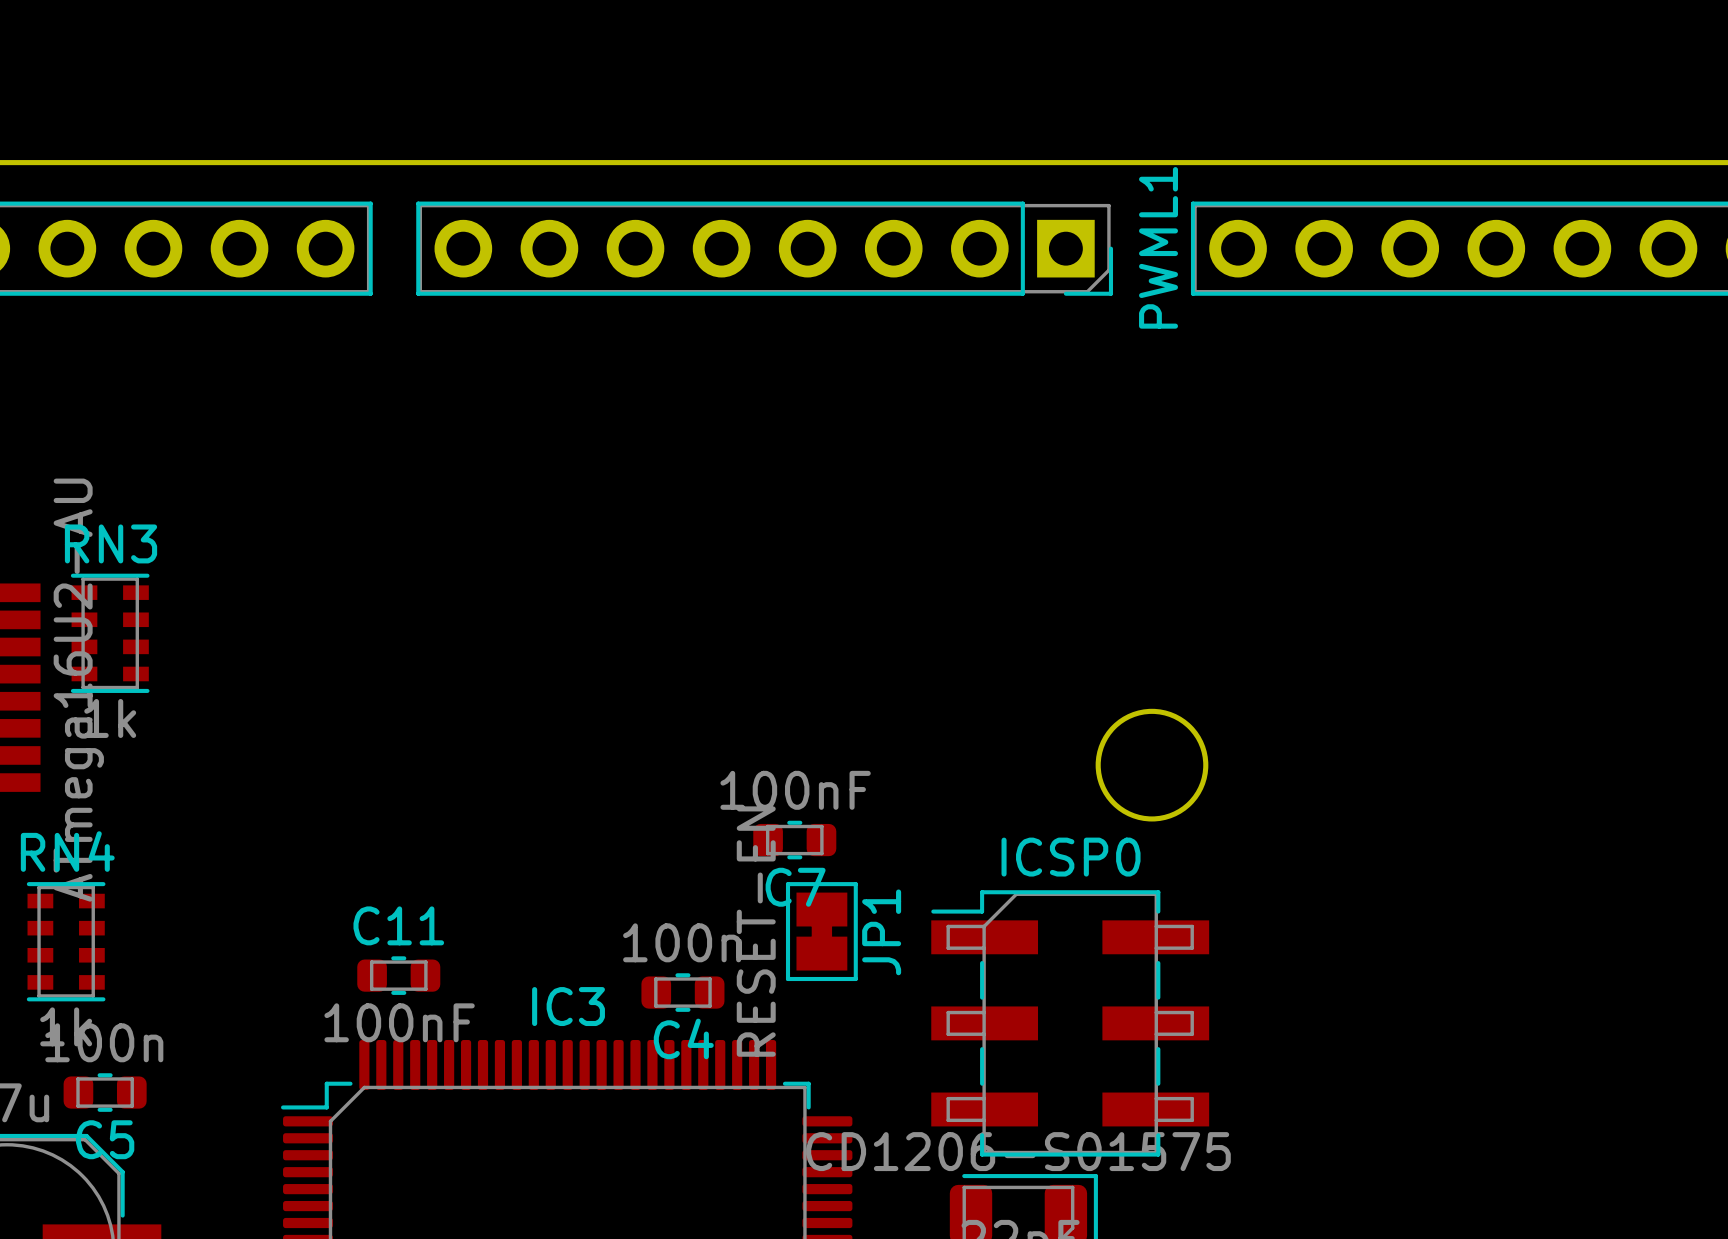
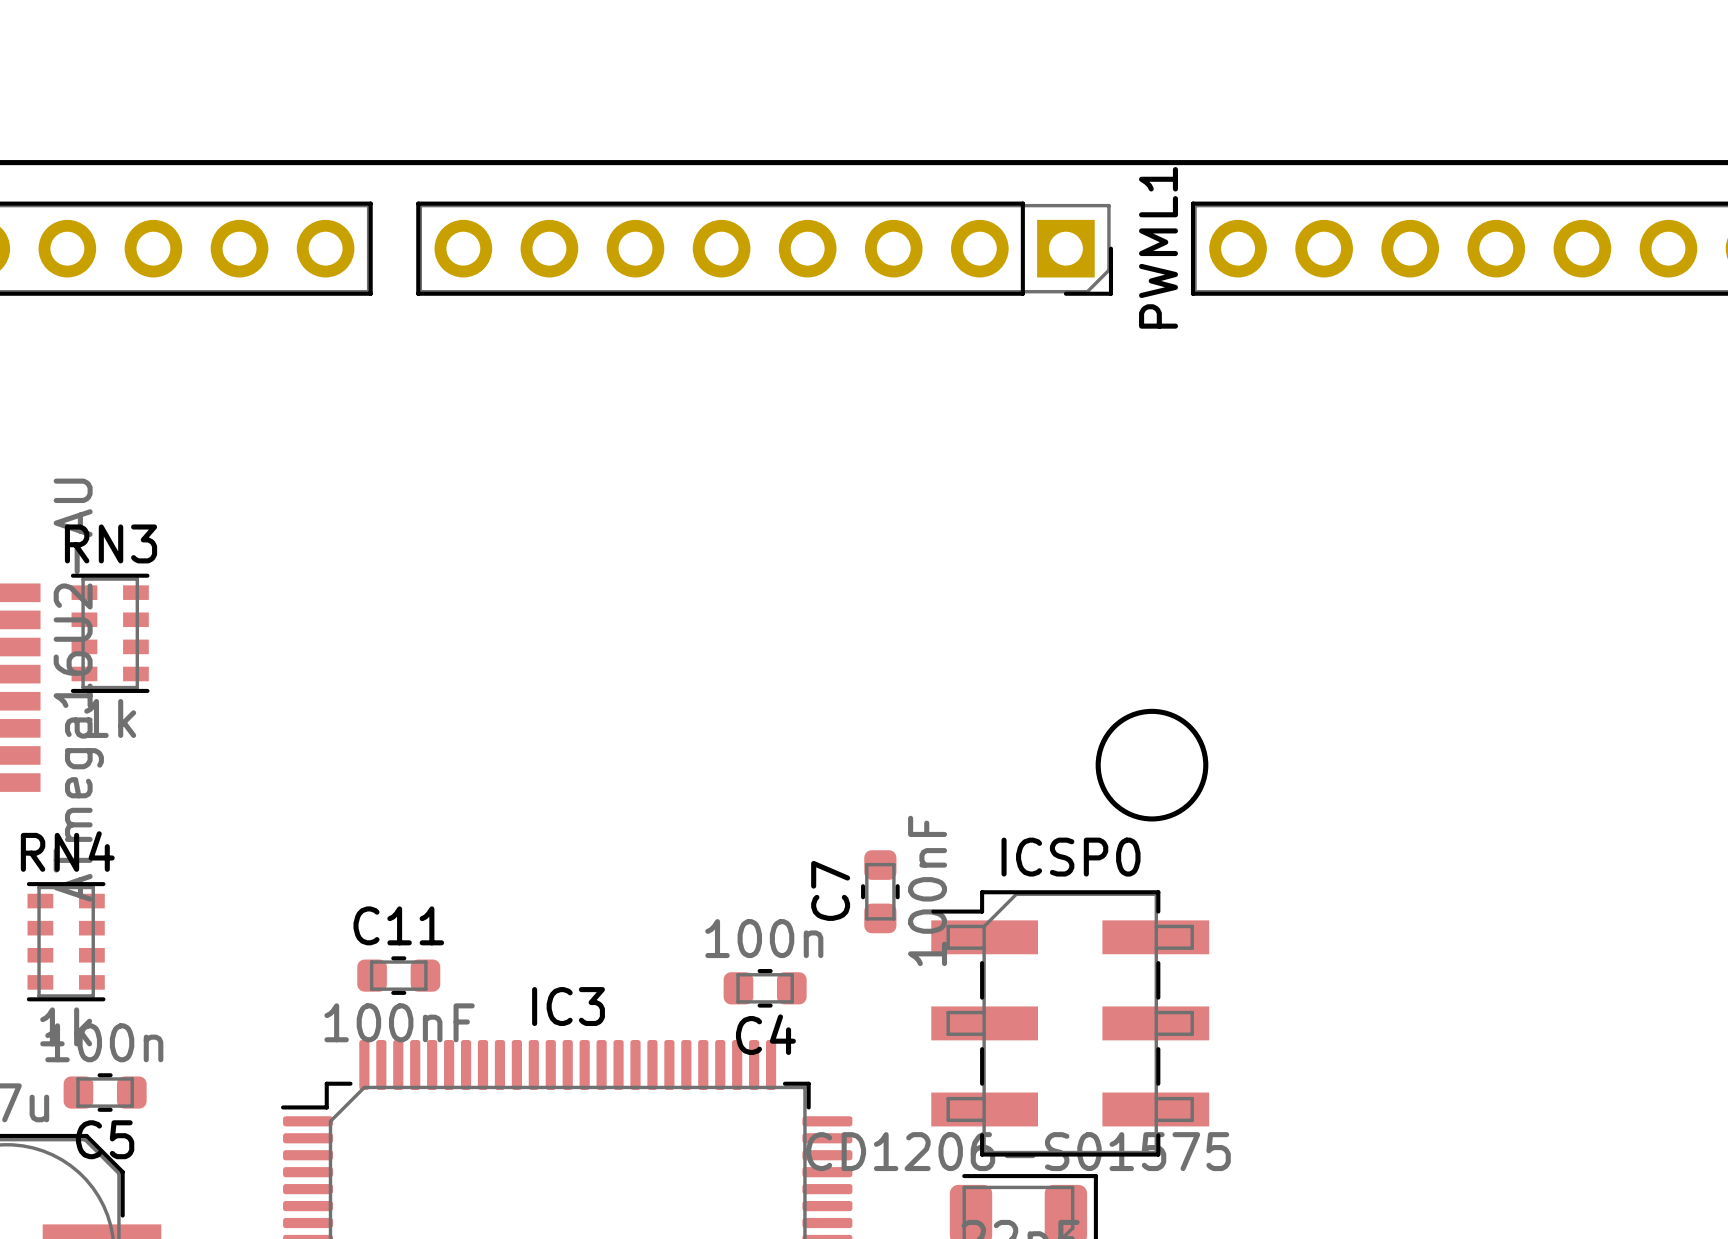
C7 rotation: 0° (794, 840) -> 90° clockwise (880, 891)
C7 position: (794, 840) -> (880, 891)
JP1: RESET-EN (821, 931) -> none
C4 position: (682, 992) -> (765, 988)

